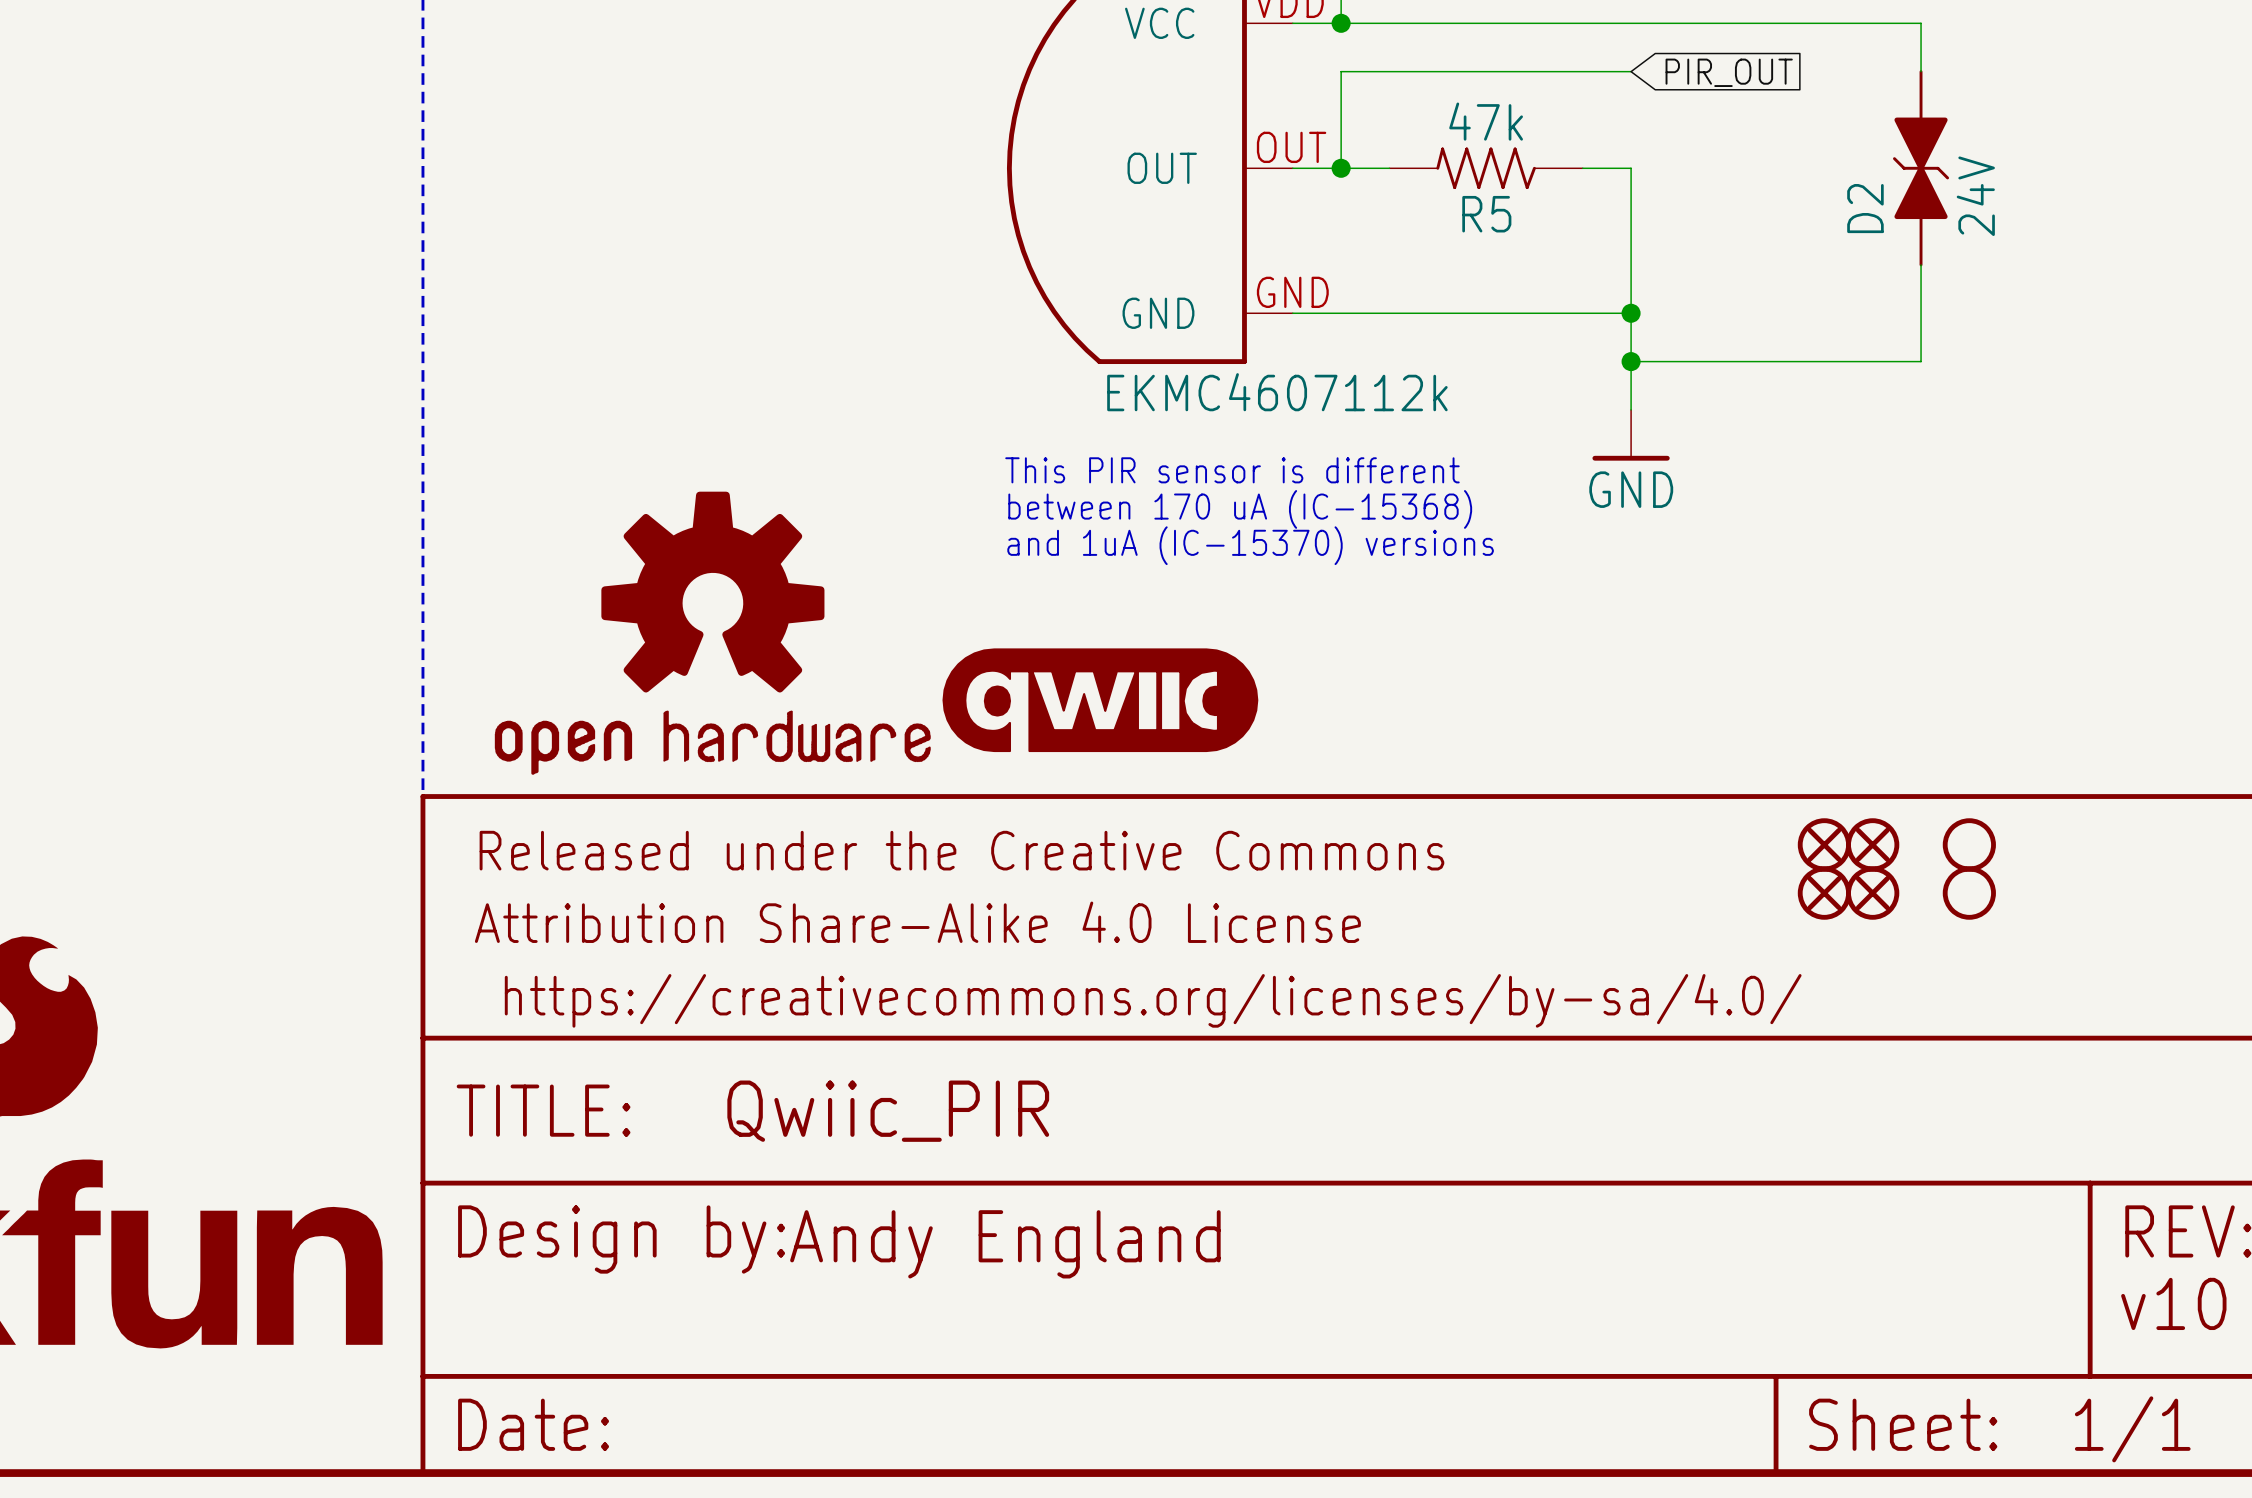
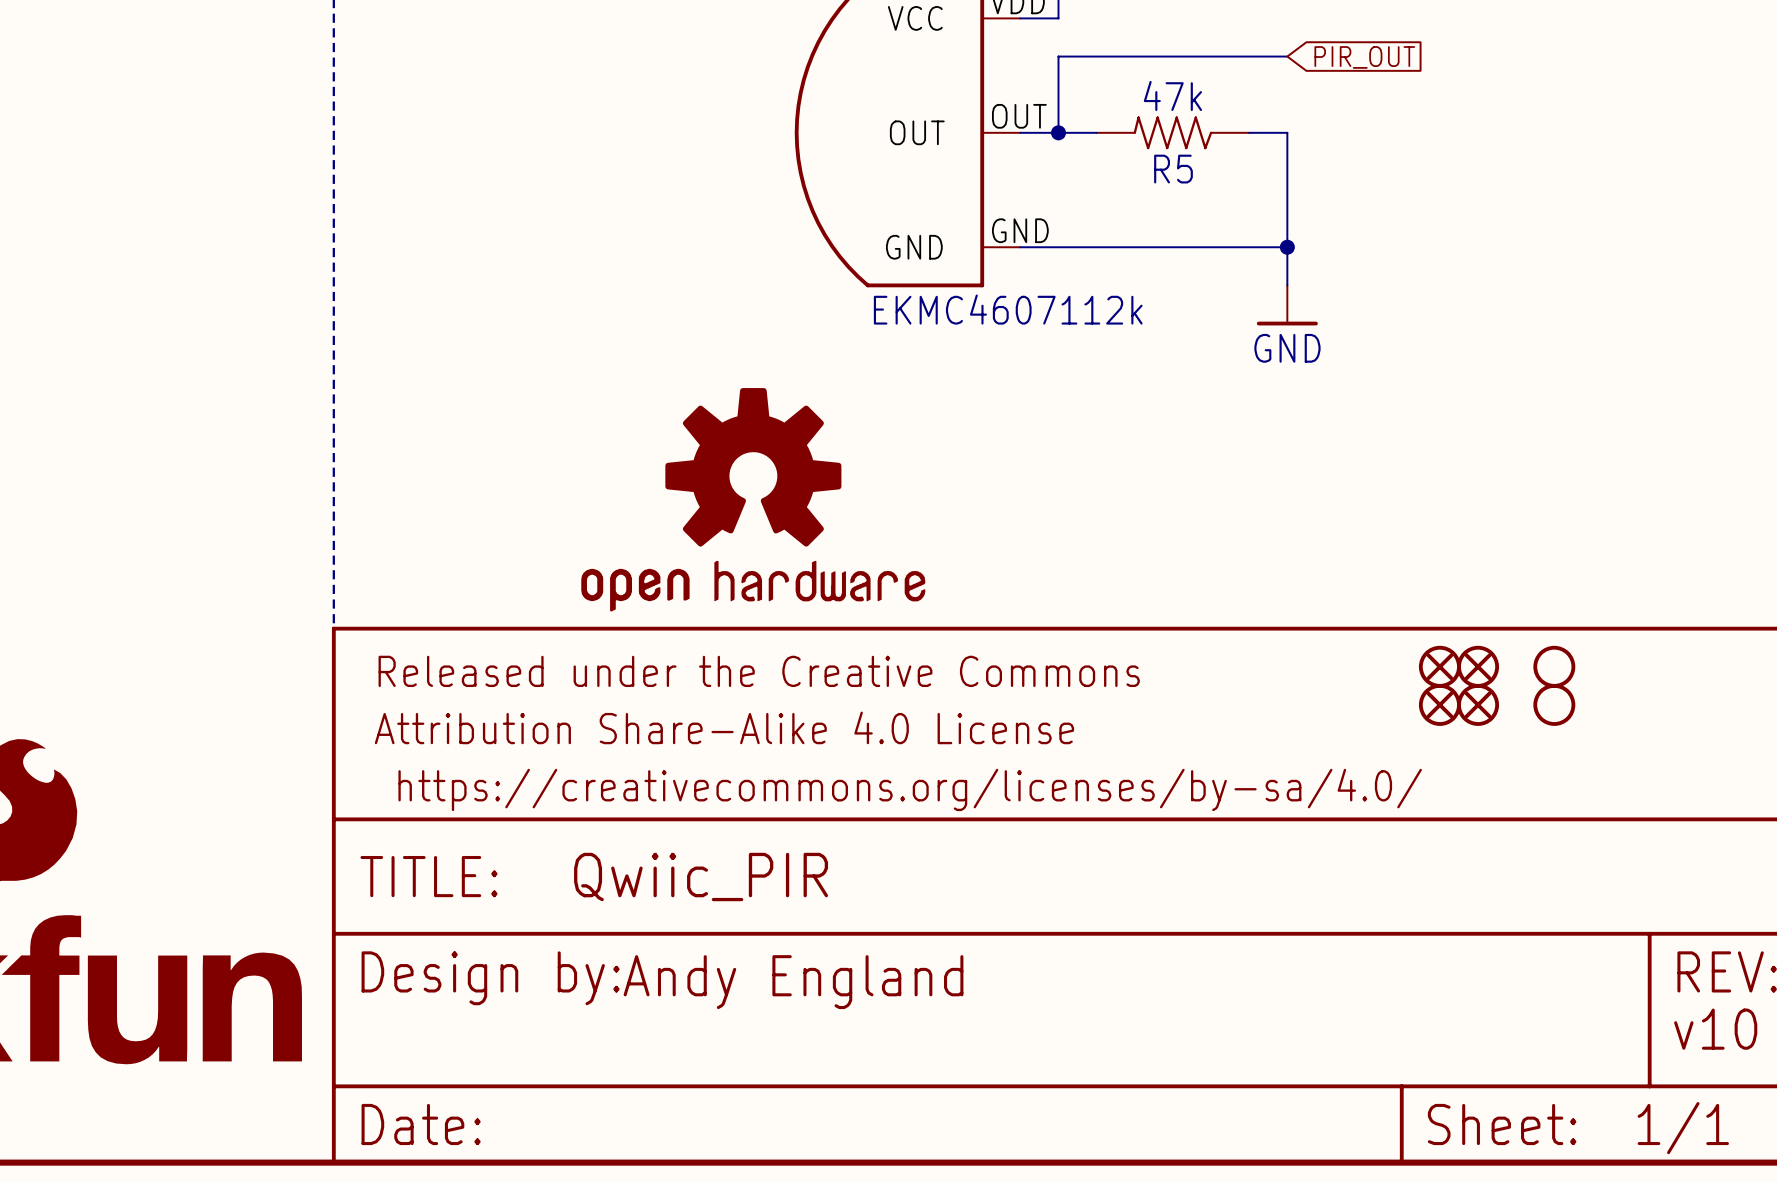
wire: (1341, 23) (1921, 23) (1921, 71) -> none
junction: (1341, 23) -> none
D2: 24V (1921, 168) -> none
wire: (1921, 264) (1921, 361) (1631, 361) (1631, 409) -> none
junction: (1631, 361) -> none
power symbol position: GND (1631, 435) -> GND (1287, 305)
text: This PIR sensor is different (1232, 470) -> none
text: between 170 uA (IC-15368) (1240, 509) -> none
text: and 1uA (IC-15370) versions (1250, 545) -> none
part position: (712, 633) -> (753, 499)
part: (1100, 700) -> none

